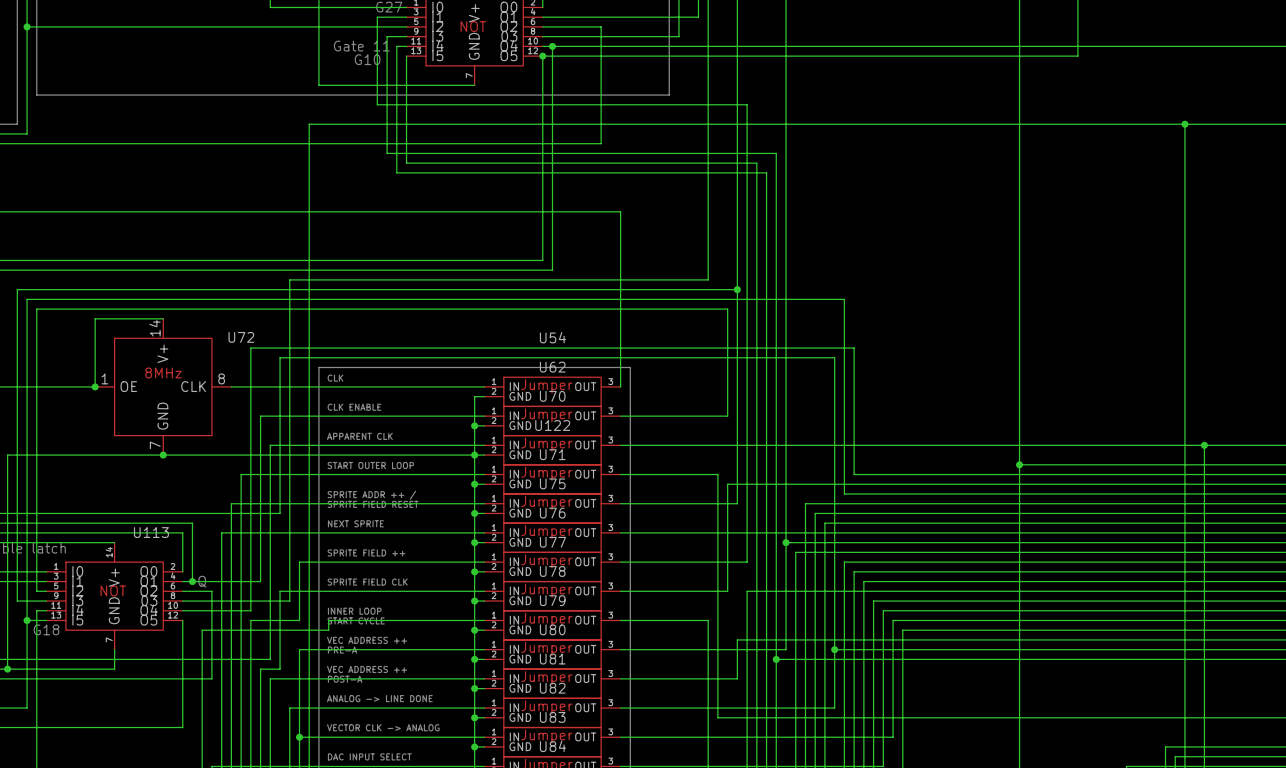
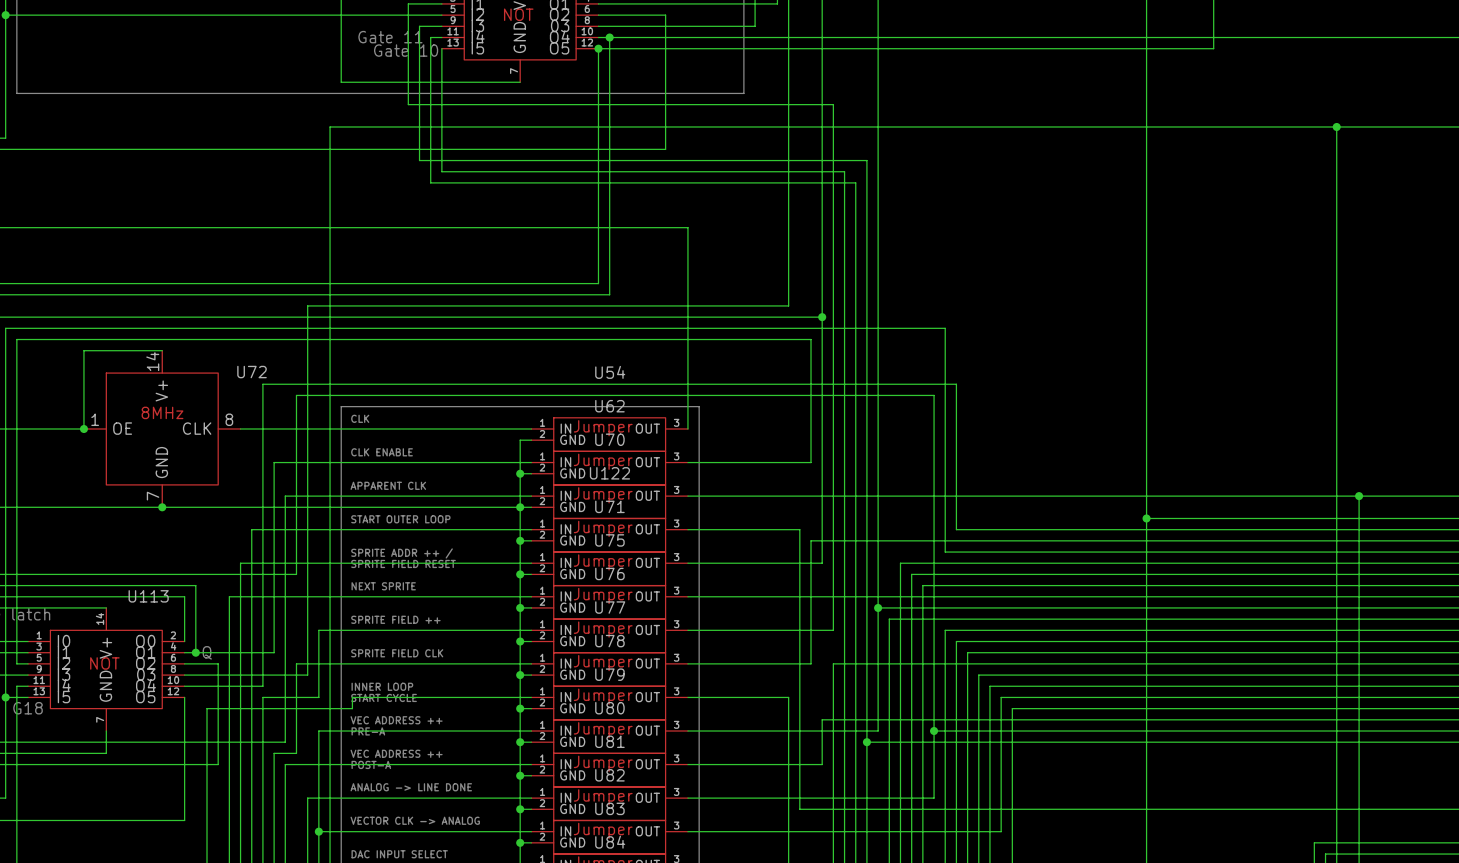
text: none -> Gate 10 (406, 50)
text: G10 (367, 59) -> none

